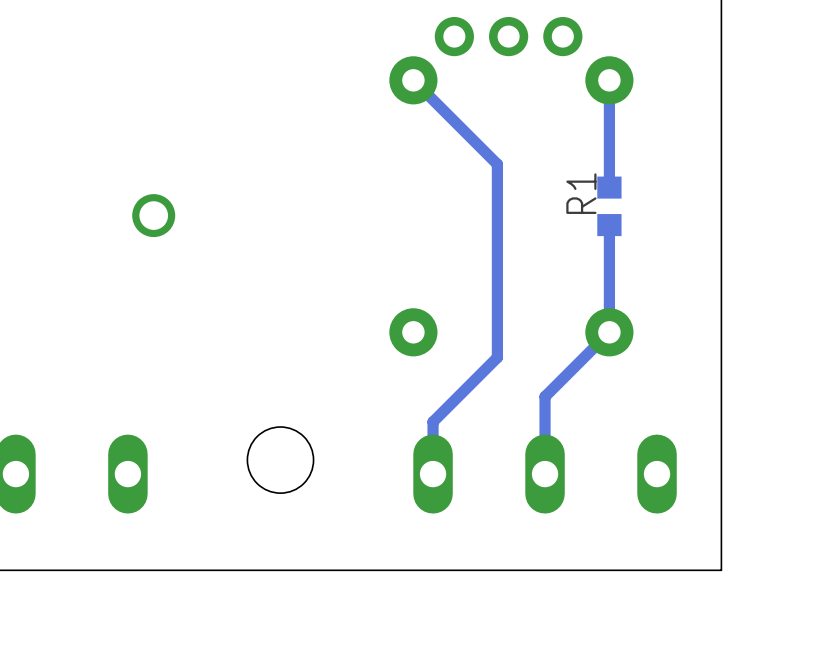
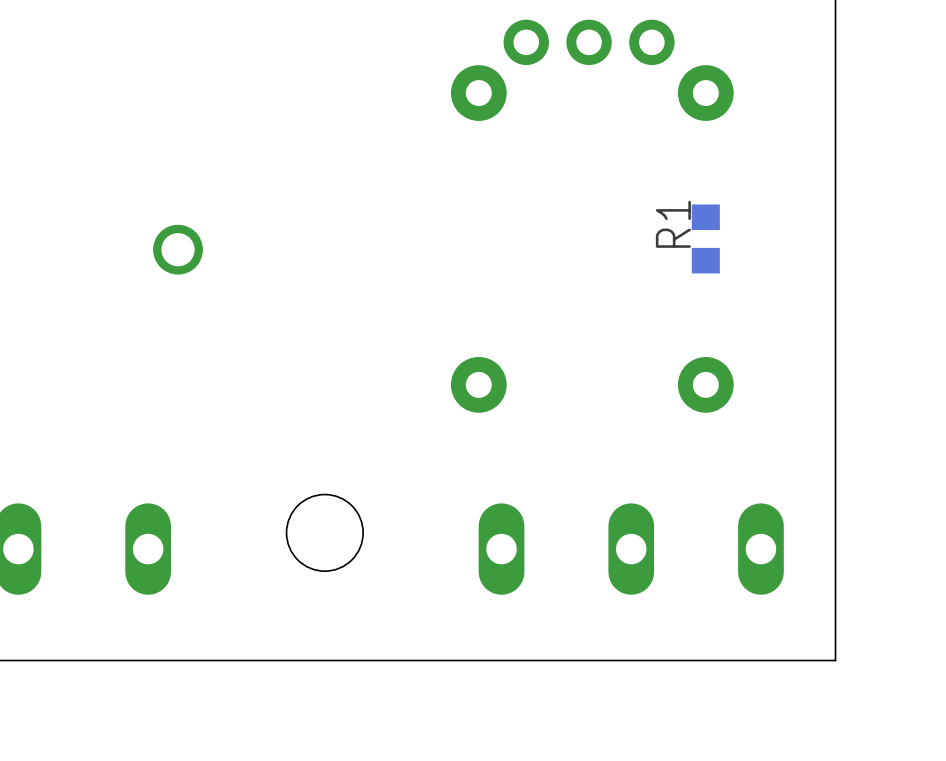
track: (413, 80) (497, 164) (497, 357) (433, 421) (433, 474) -> none
track: (609, 80) (609, 187) -> none
track: (609, 225) (609, 332) (545, 396) (545, 474) -> none

